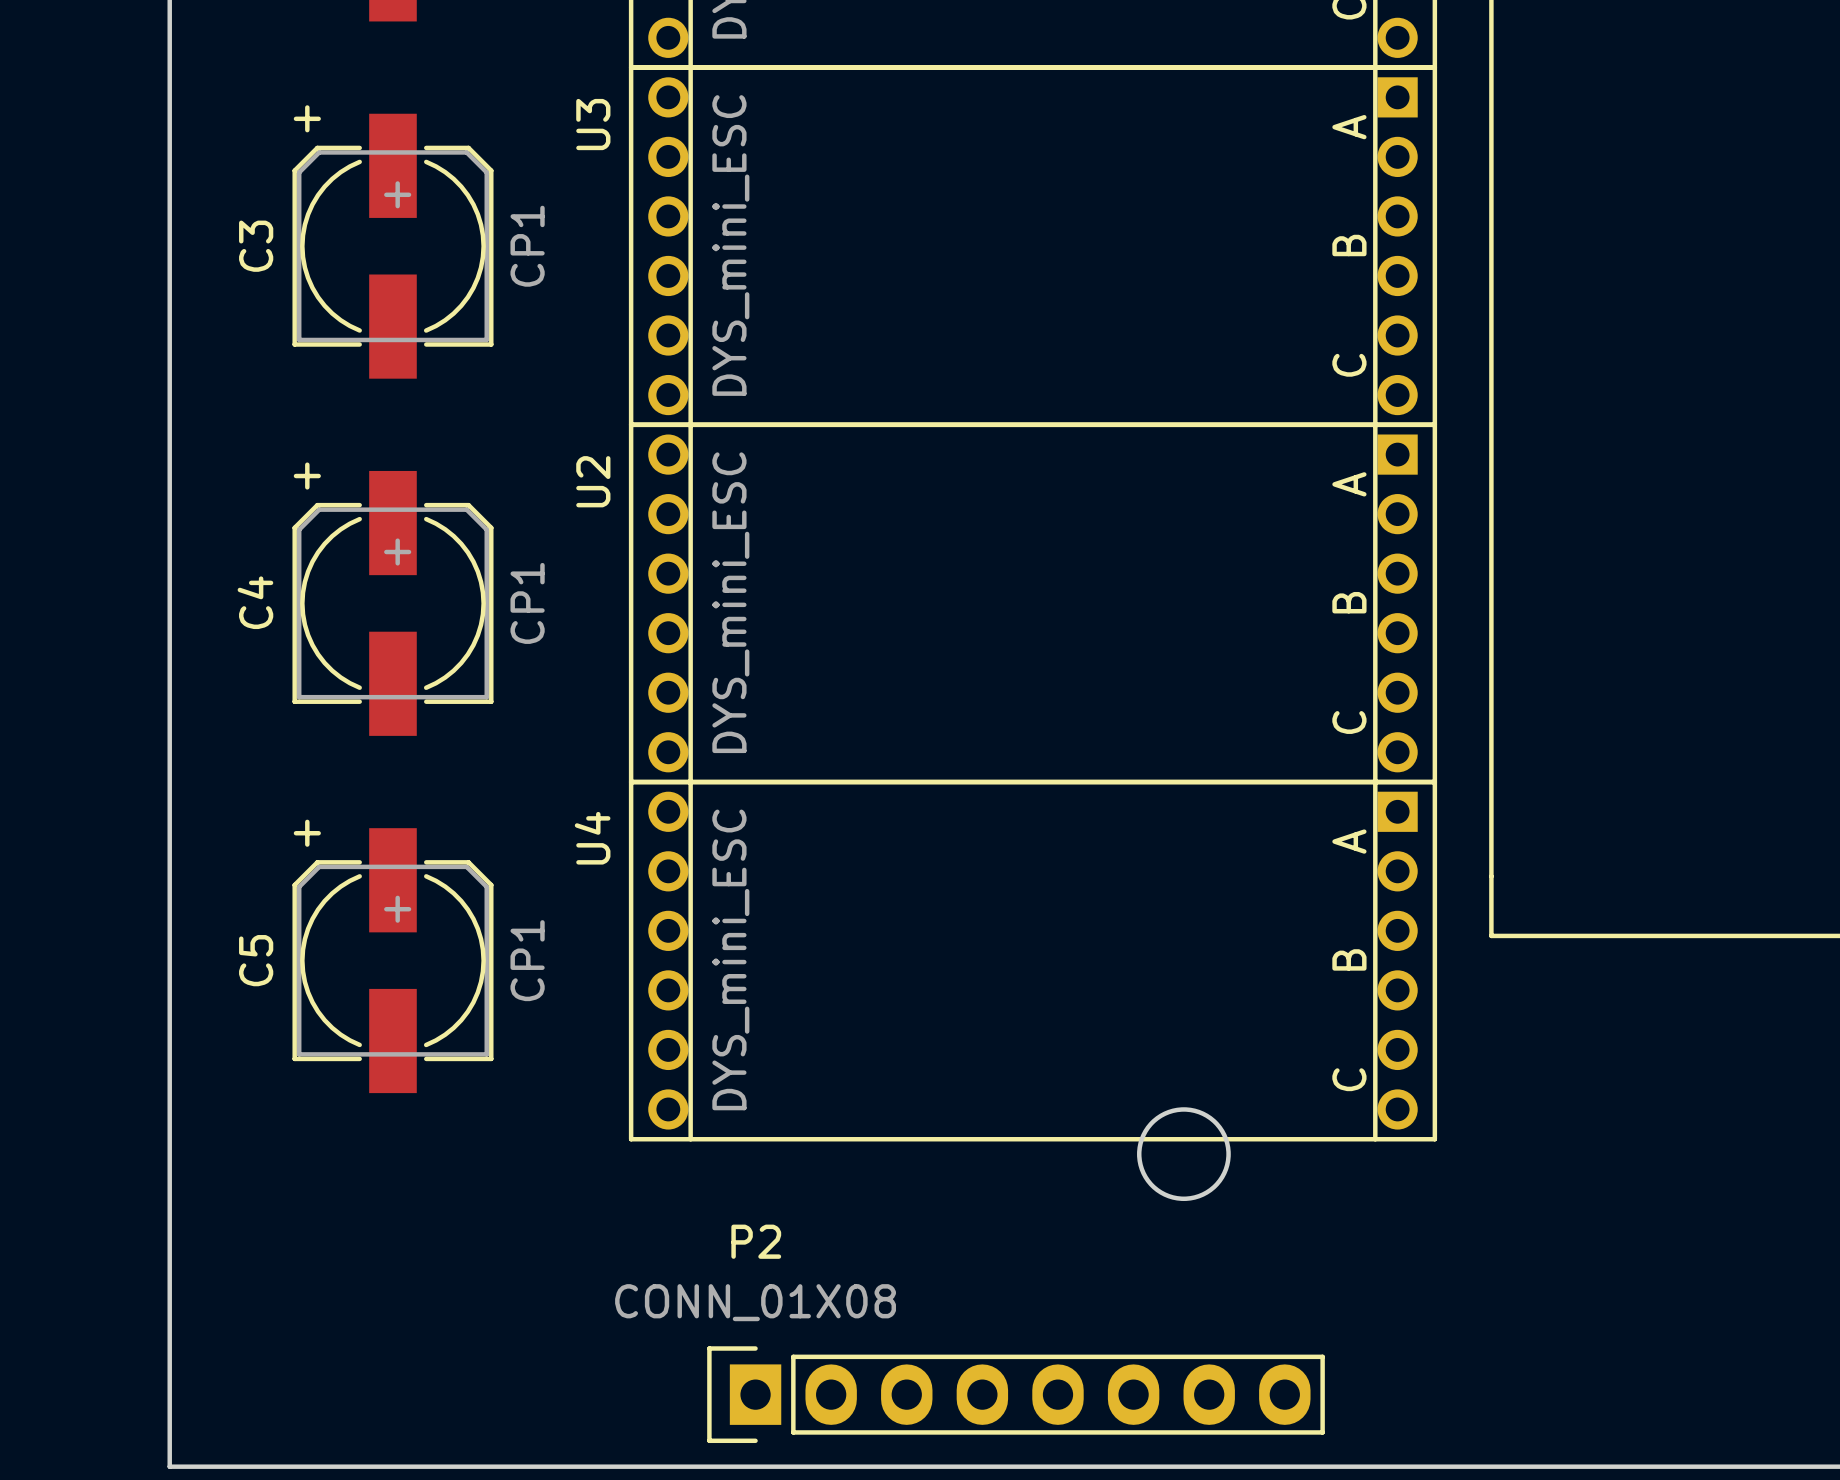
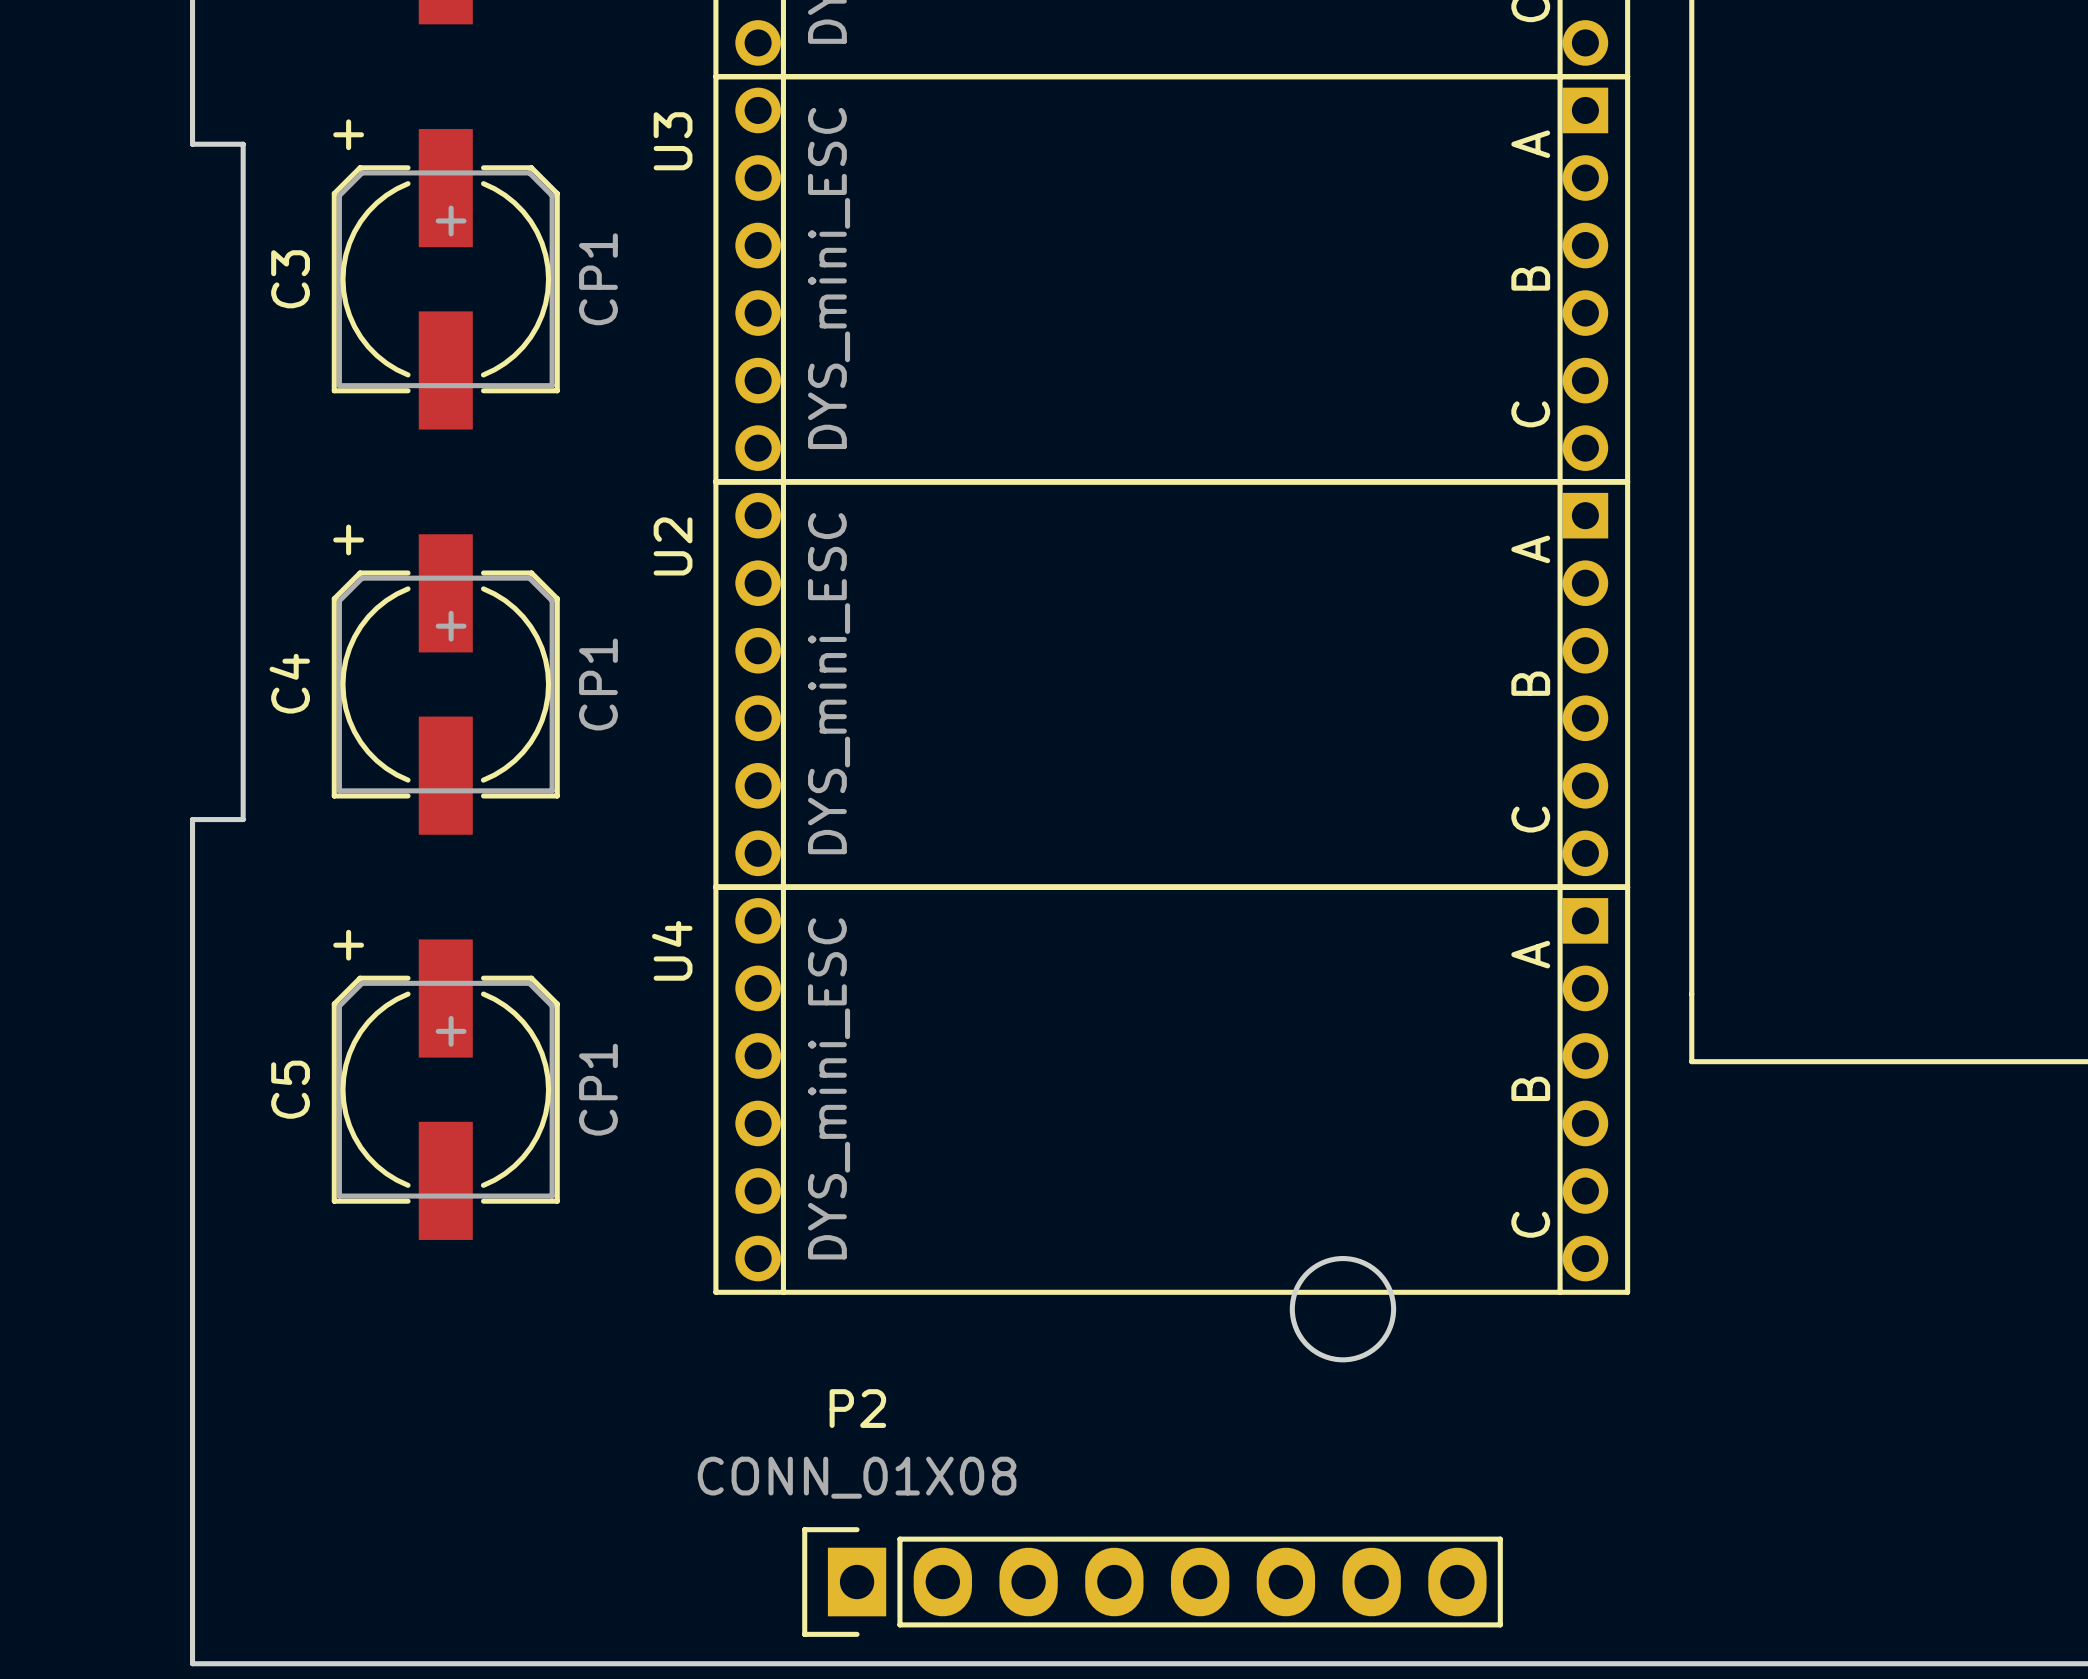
board edge: (169, 127) (169, 722) -> (192, 144) (243, 144) (243, 819) (192, 819)

